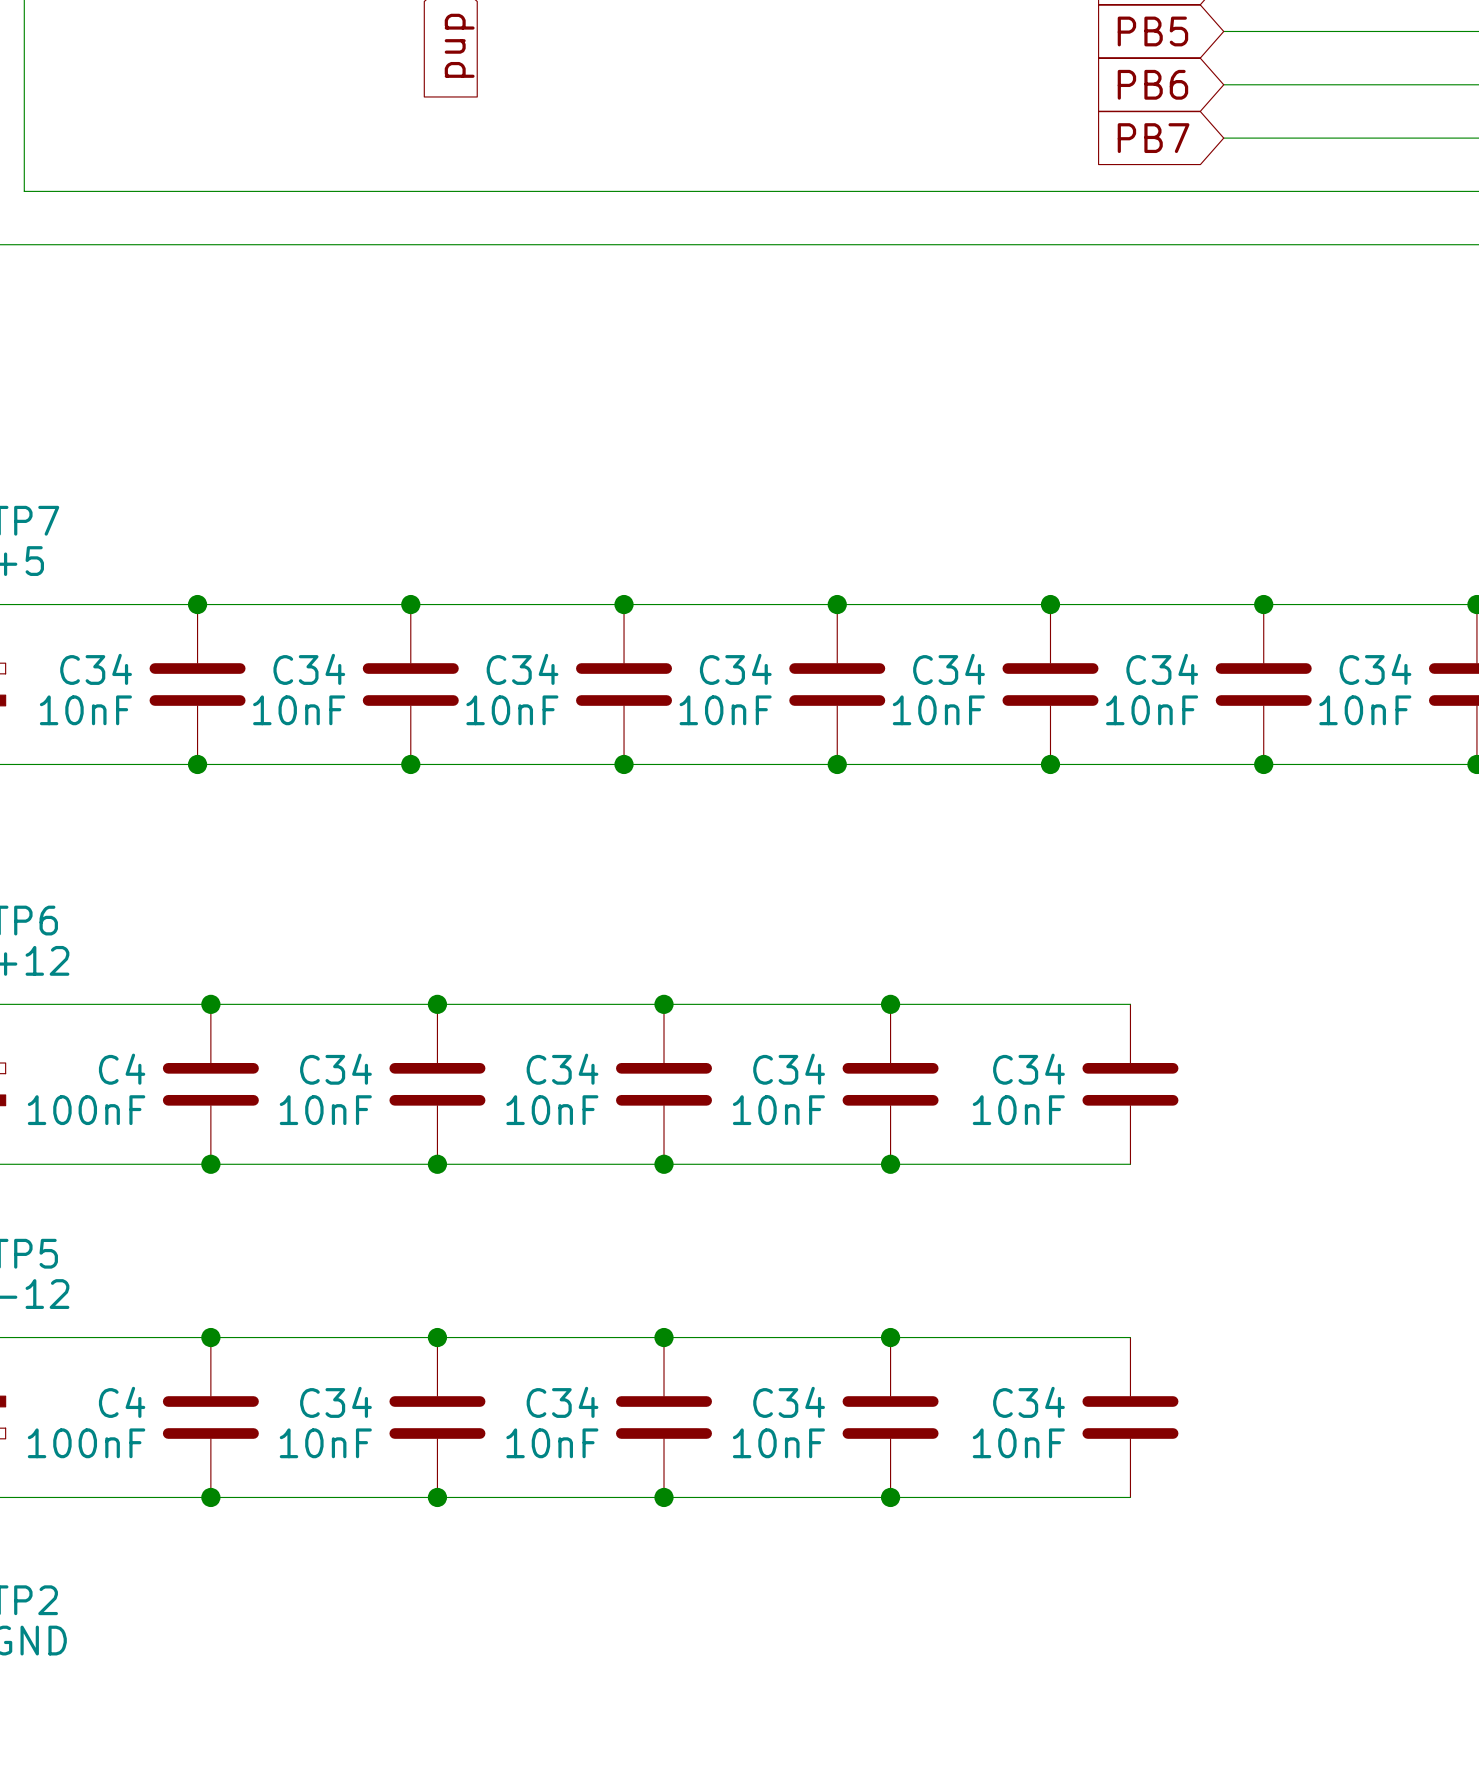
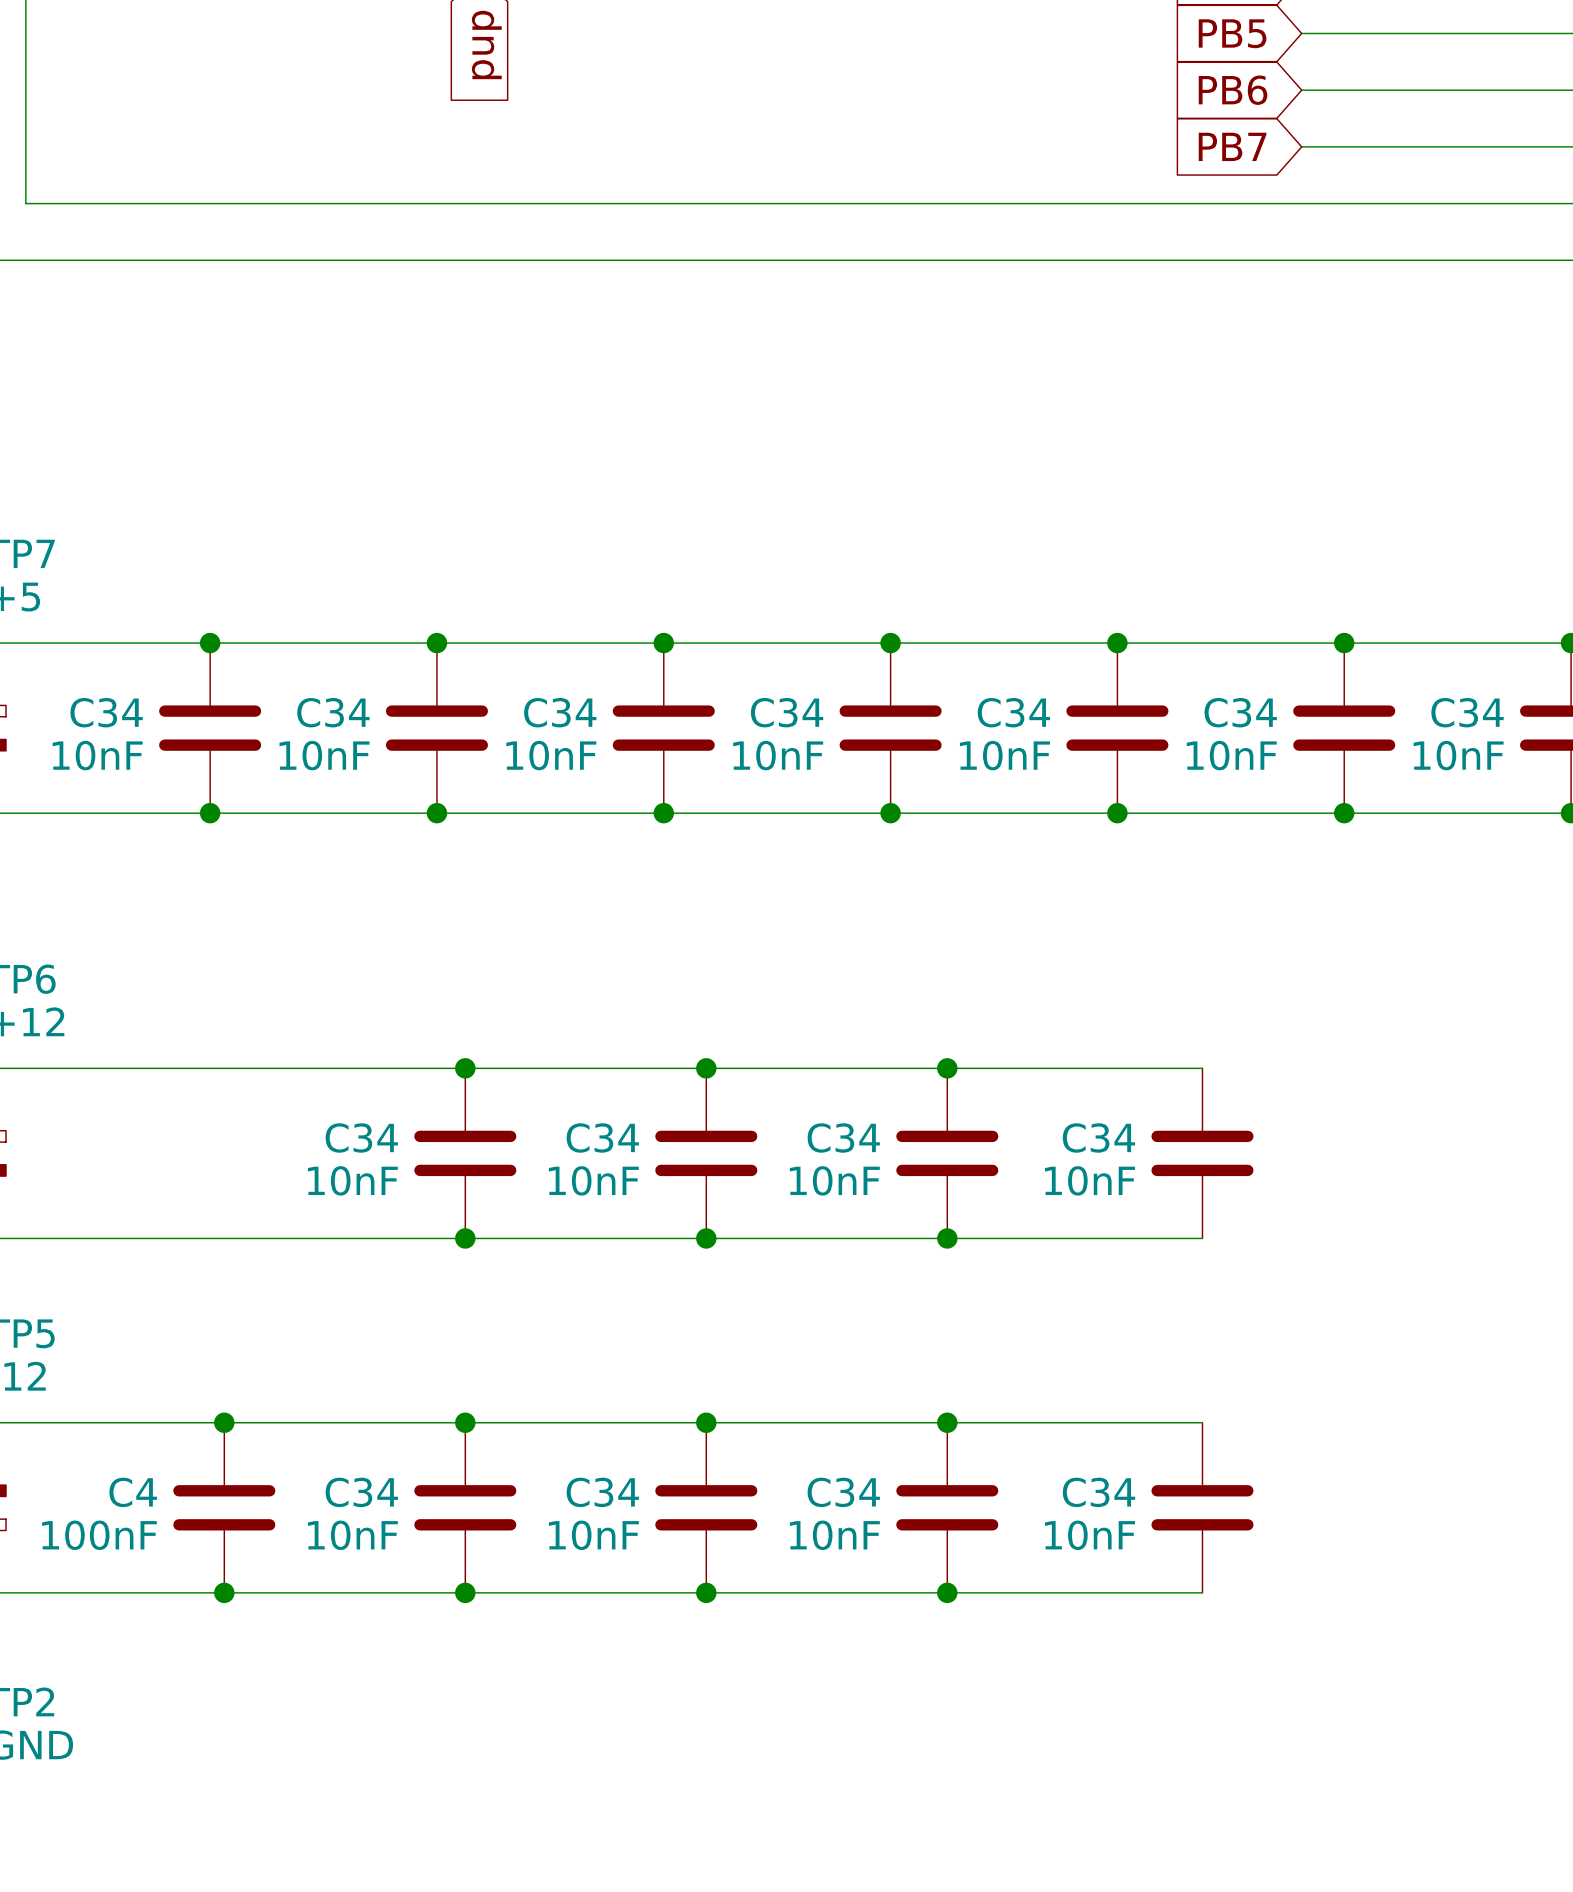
junction: (210, 1004) -> none
C4: 100nF (210, 1084) -> none
junction: (210, 1164) -> none

